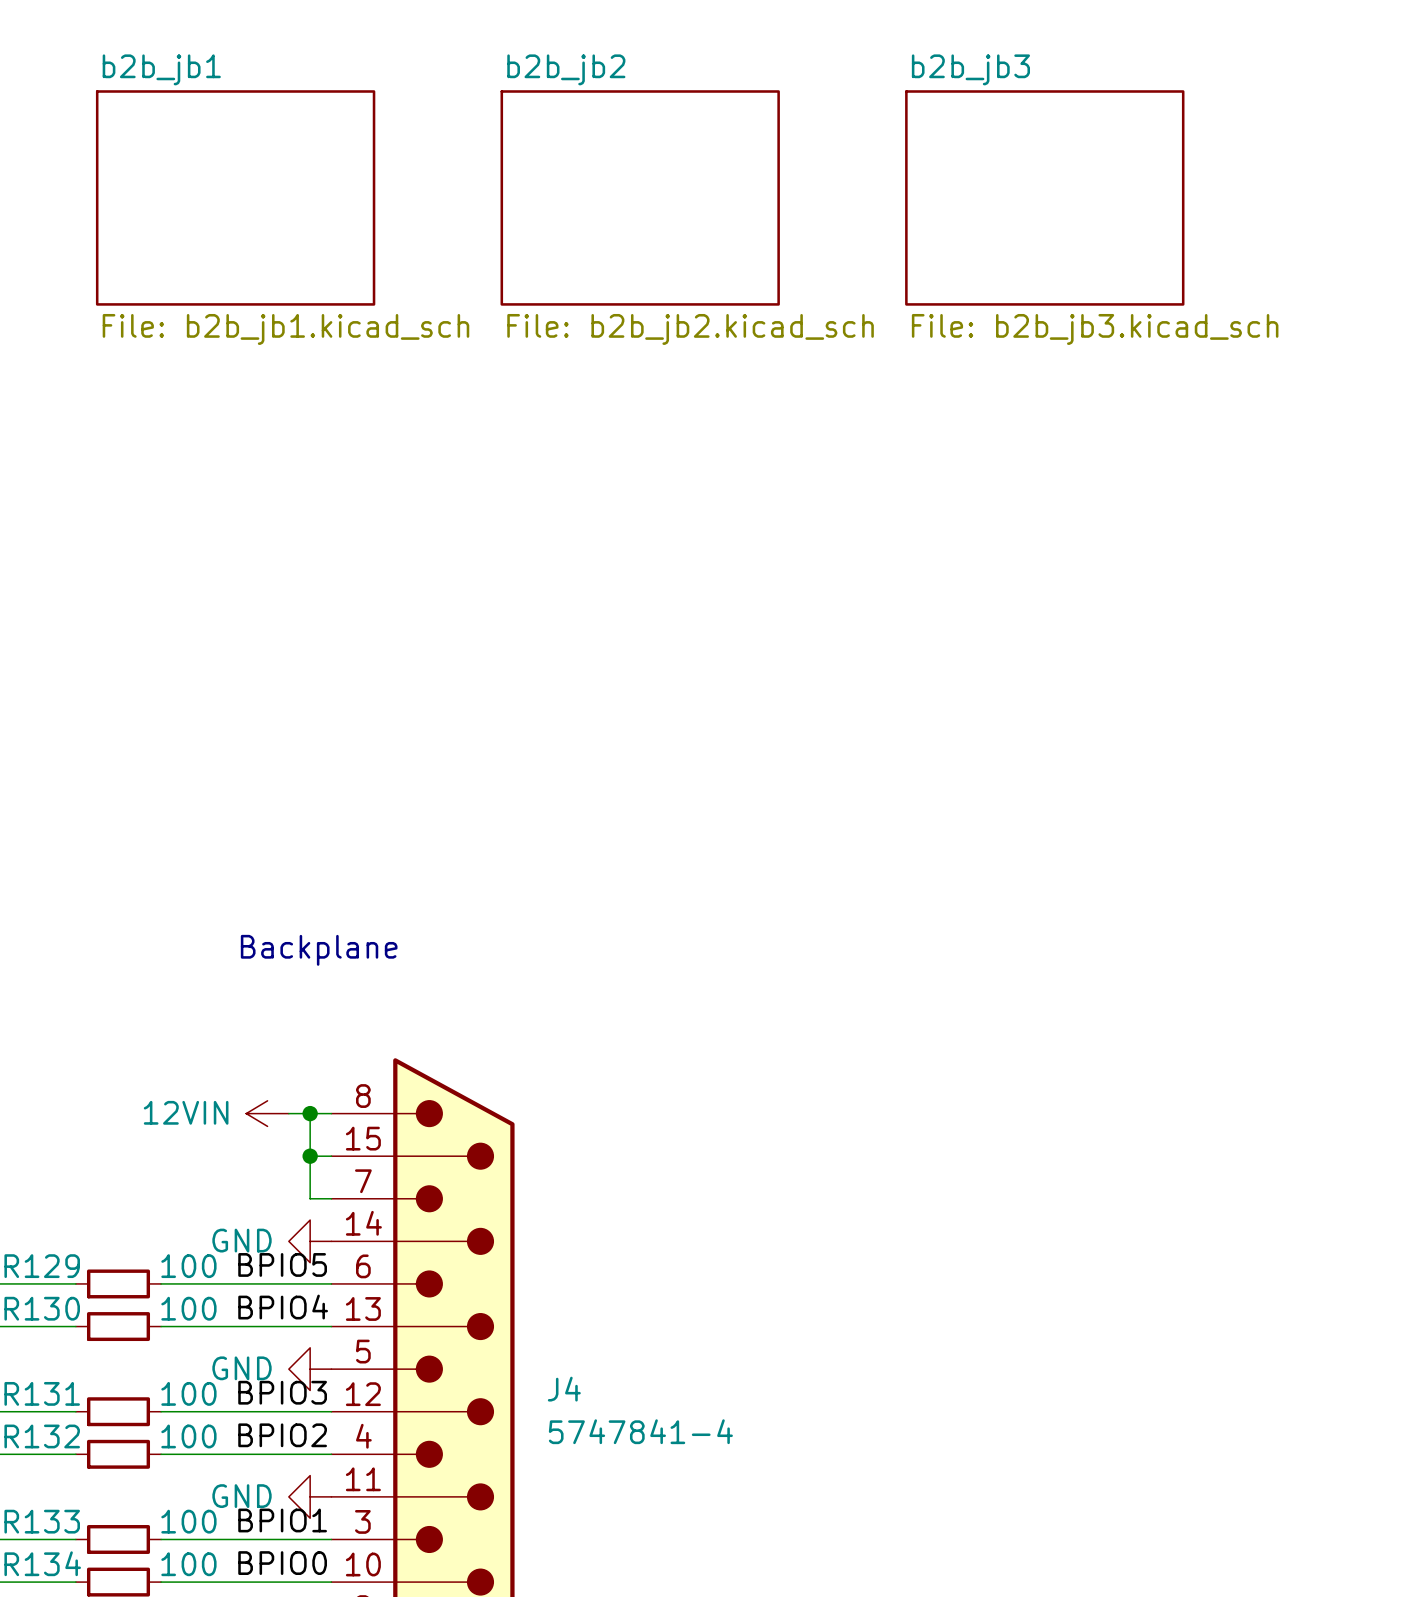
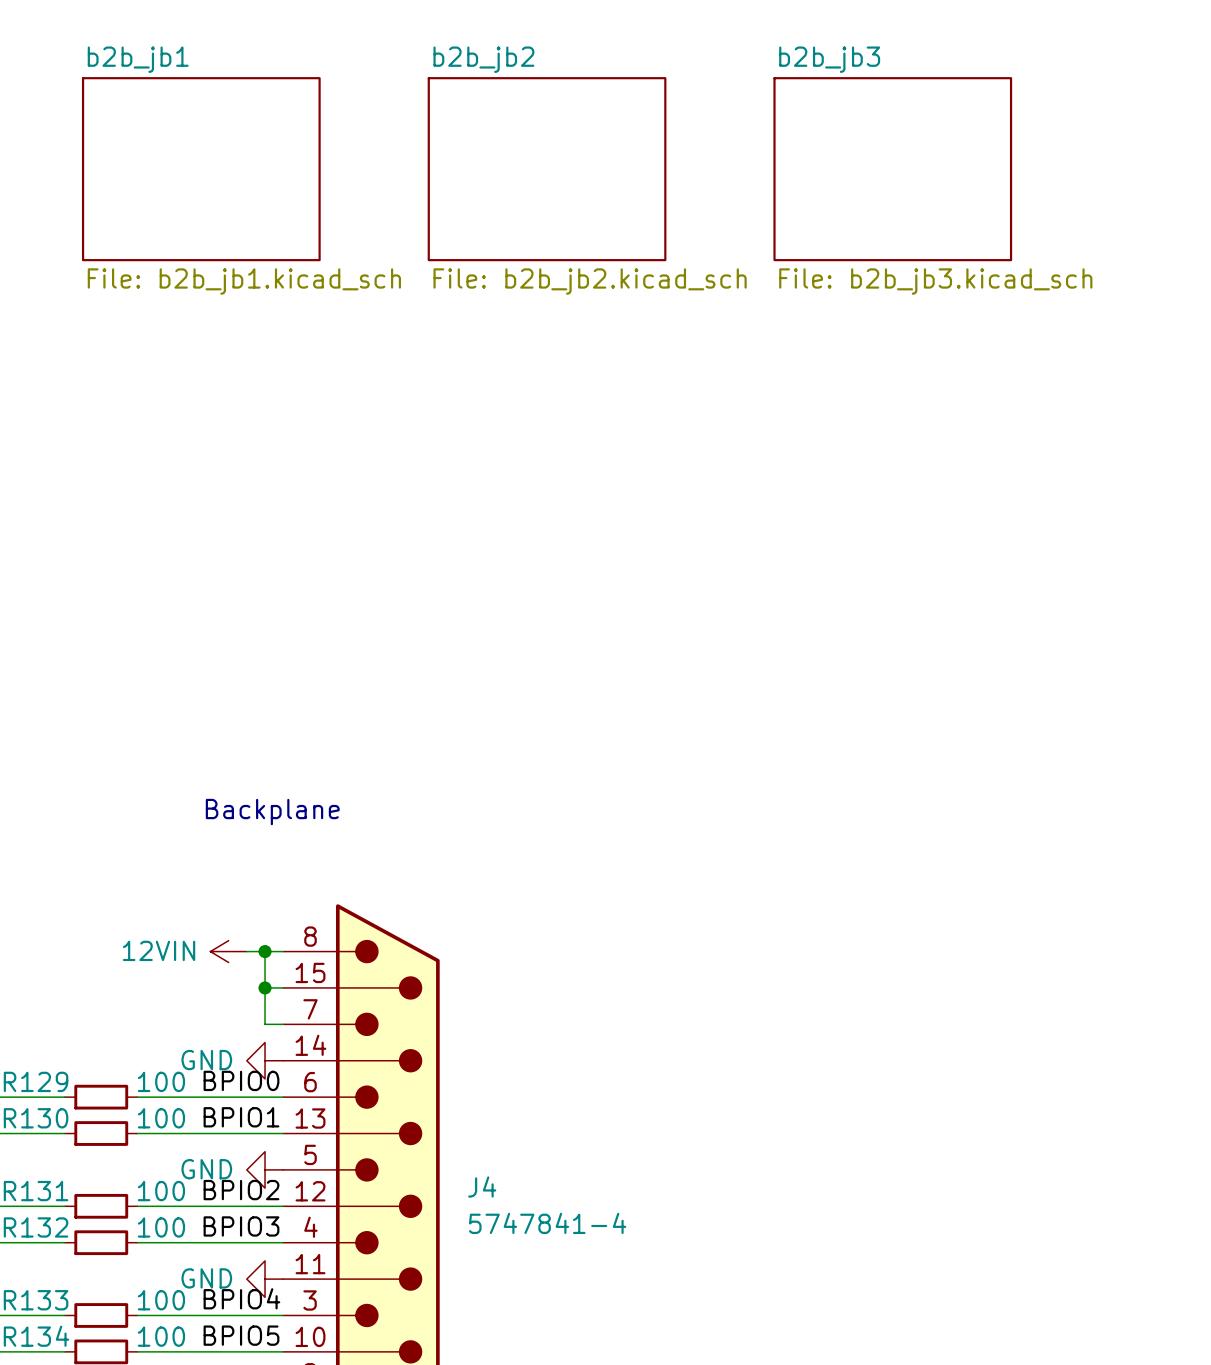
label: BPIO5 (282, 1264) -> BPIO0 (241, 1080)
label: BPIO4 (283, 1307) -> BPIO1 (241, 1117)
label: BPIO3 (282, 1392) -> BPIO2 (241, 1190)
label: BPIO2 (282, 1435) -> BPIO3 (241, 1226)
label: BPIO1 (282, 1520) -> BPIO4 (241, 1298)
label: BPIO0 (282, 1563) -> BPIO5 (241, 1335)

